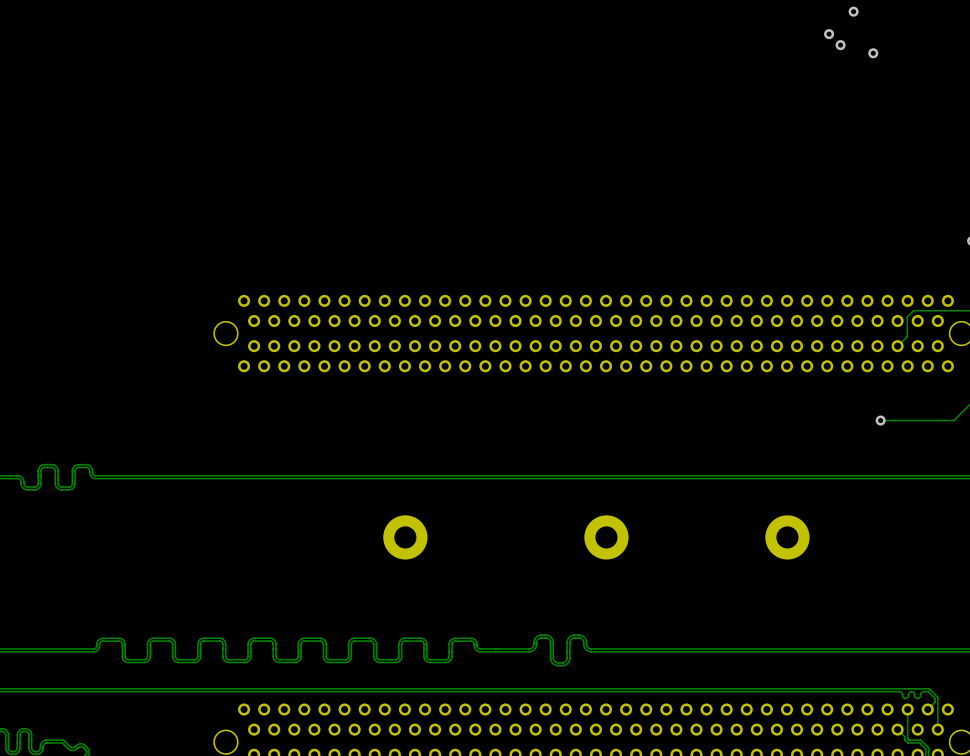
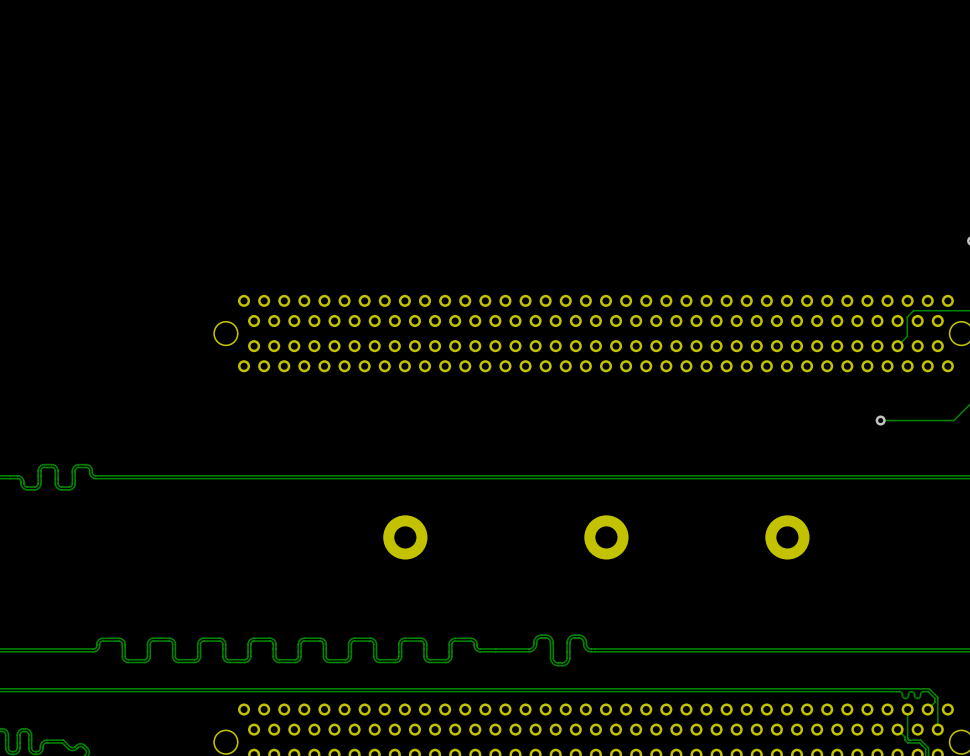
via: (853, 11) -> none
via: (829, 34) -> none
via: (840, 45) -> none
via: (873, 53) -> none

